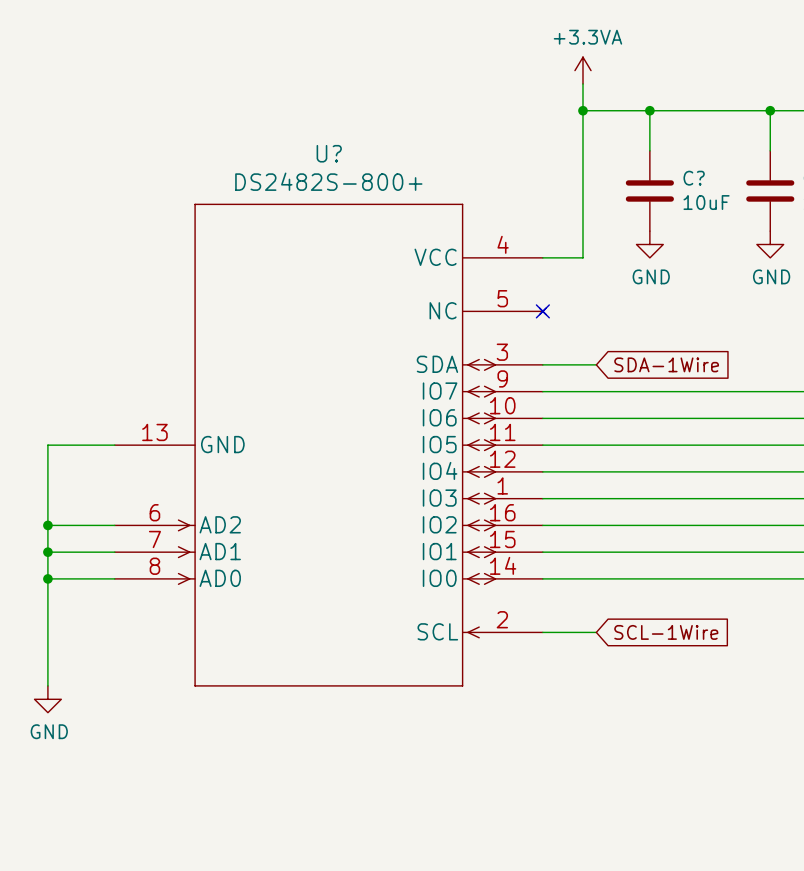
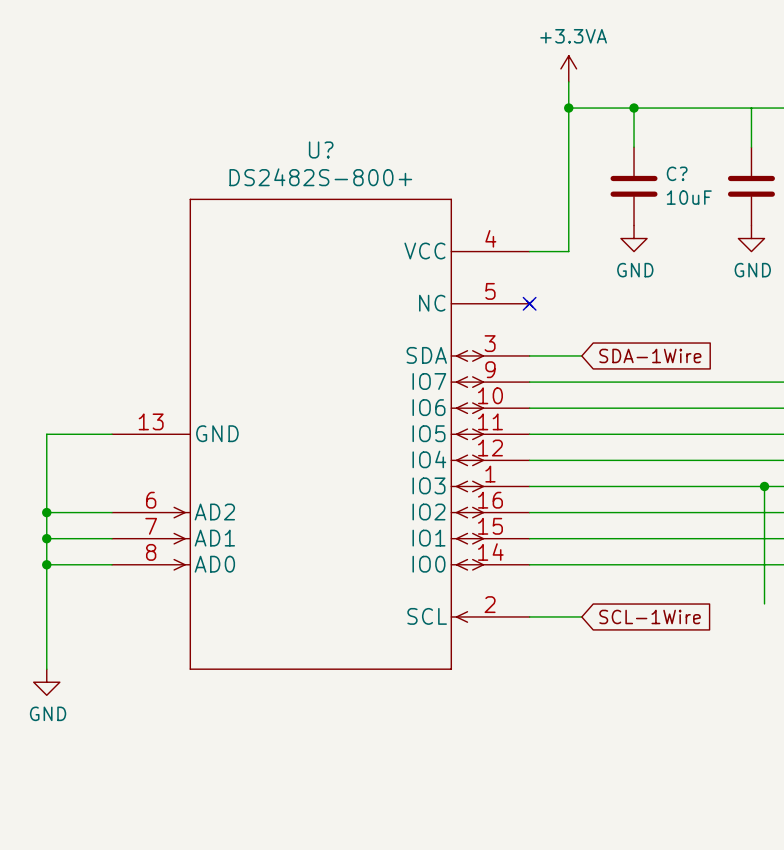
junction: (770, 110) -> none
wire: none -> (764, 486) (764, 603)
junction: none -> (764, 486)

